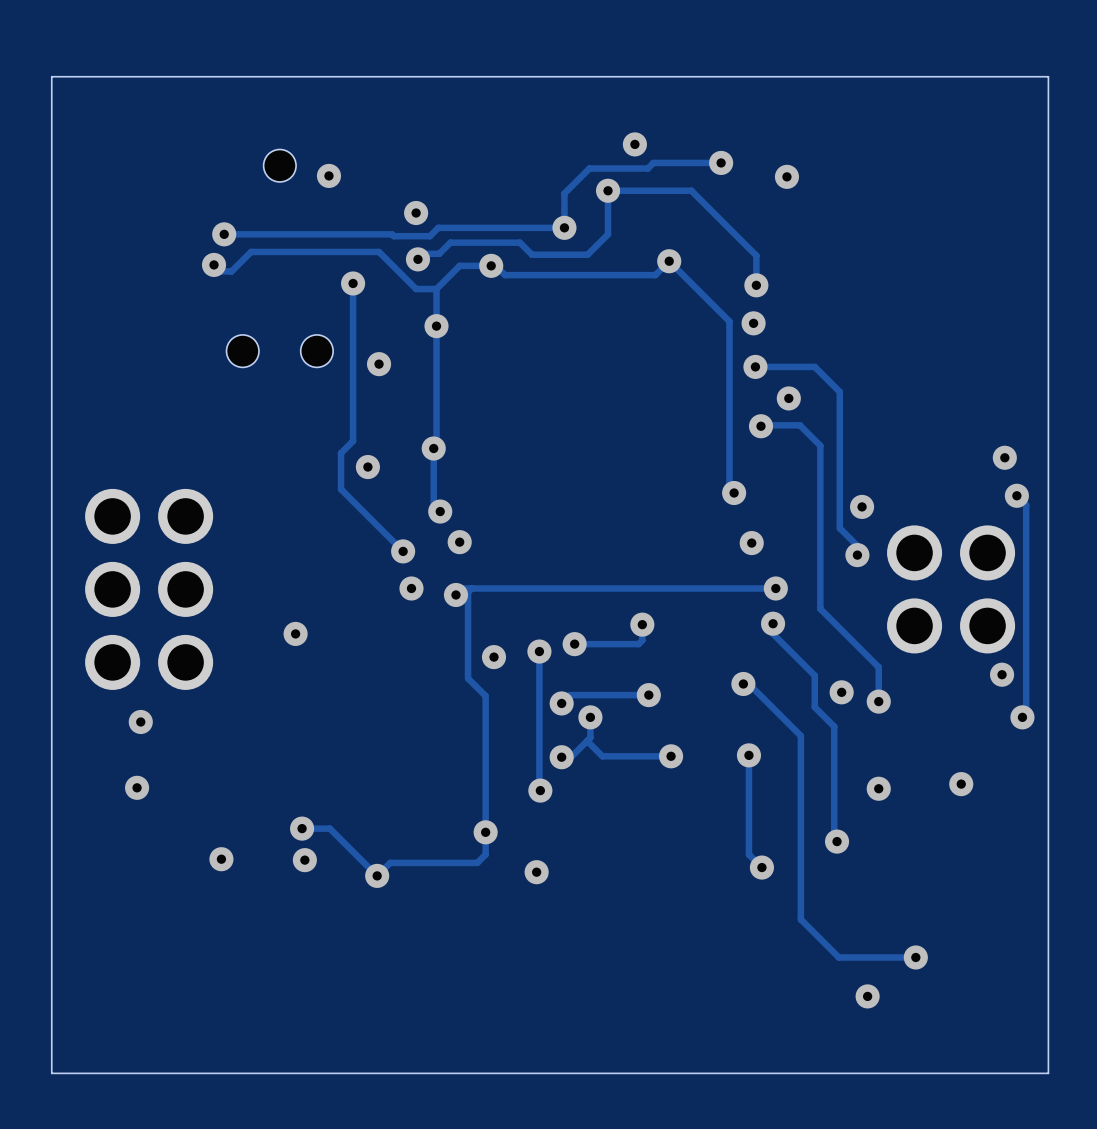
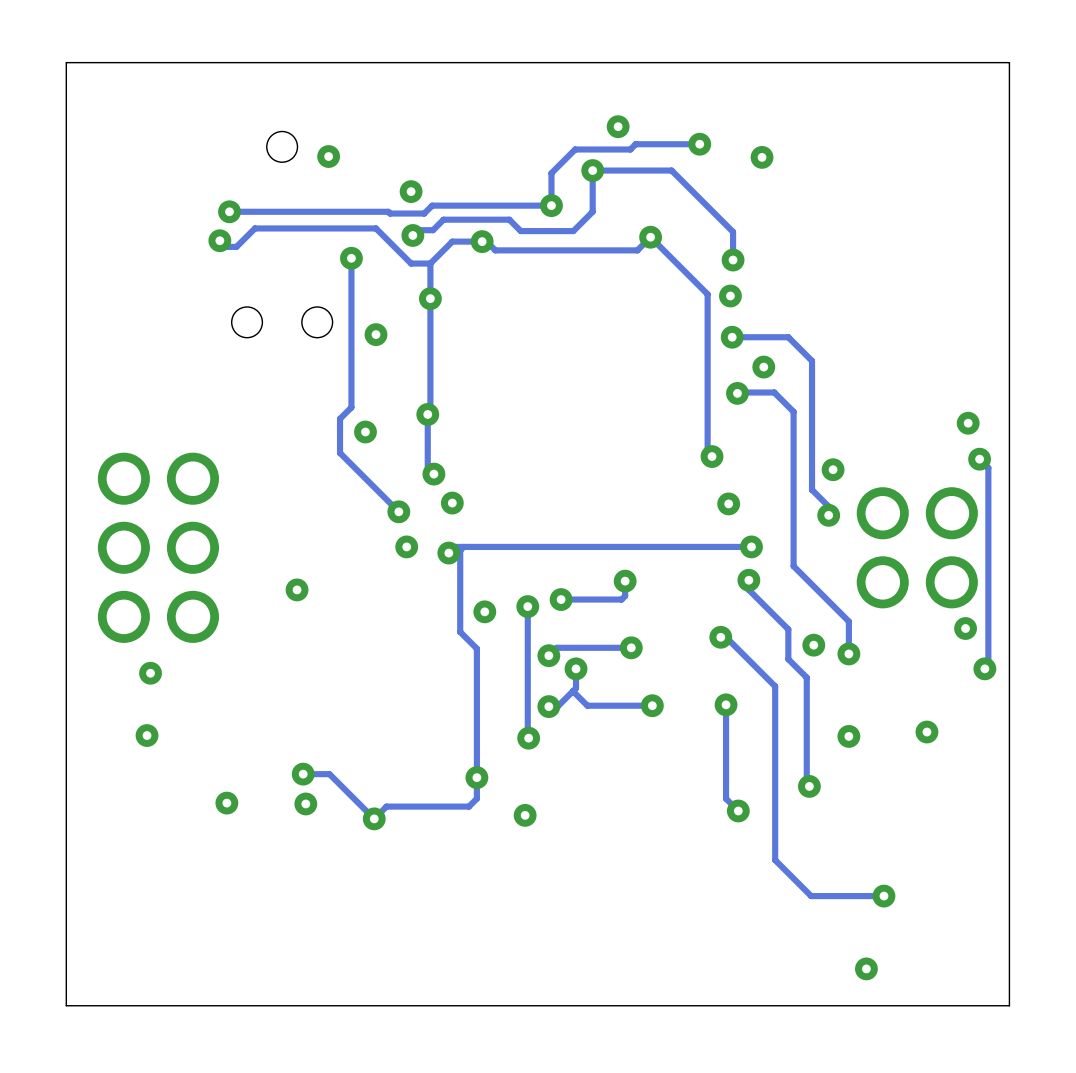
via position: (867, 996) -> (866, 968)

